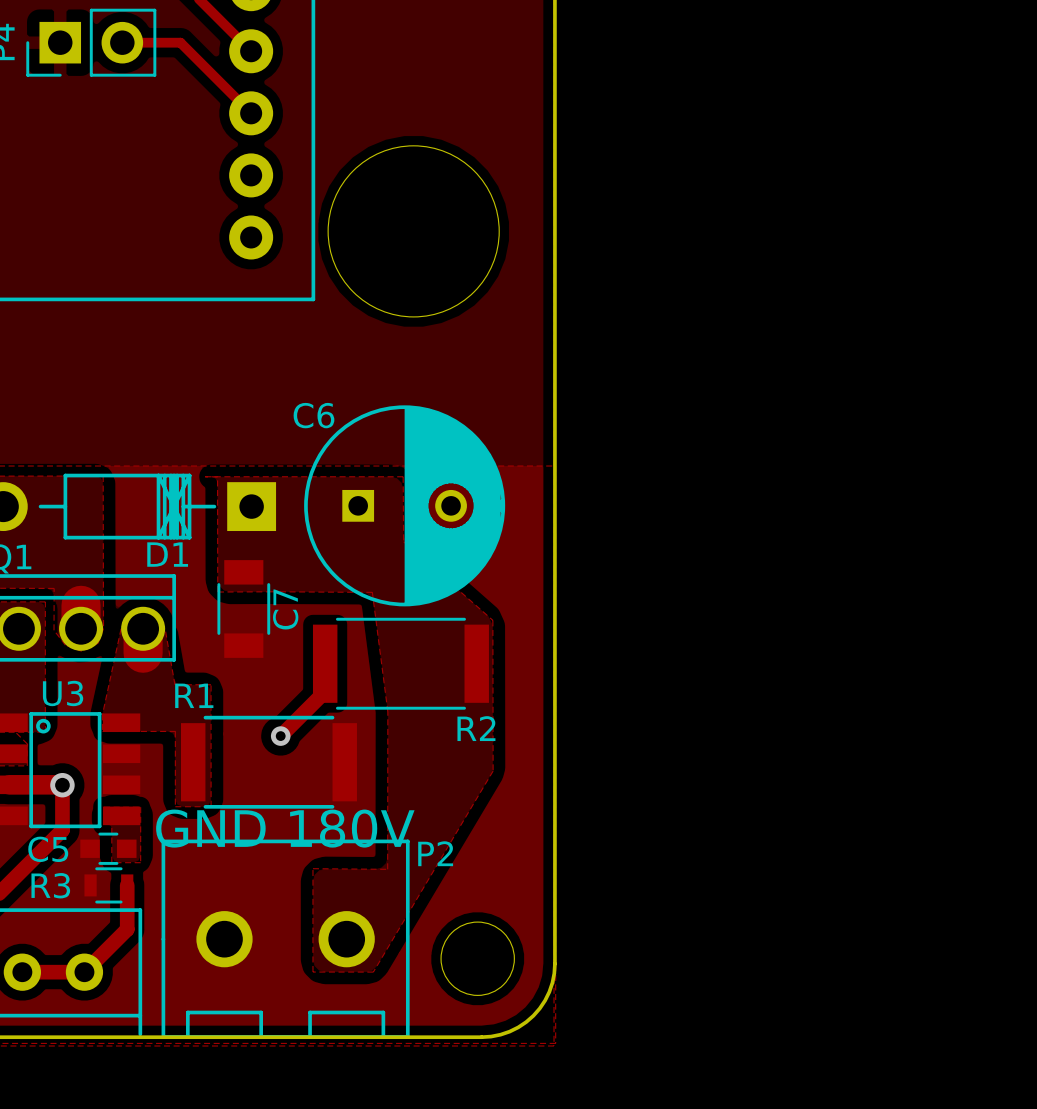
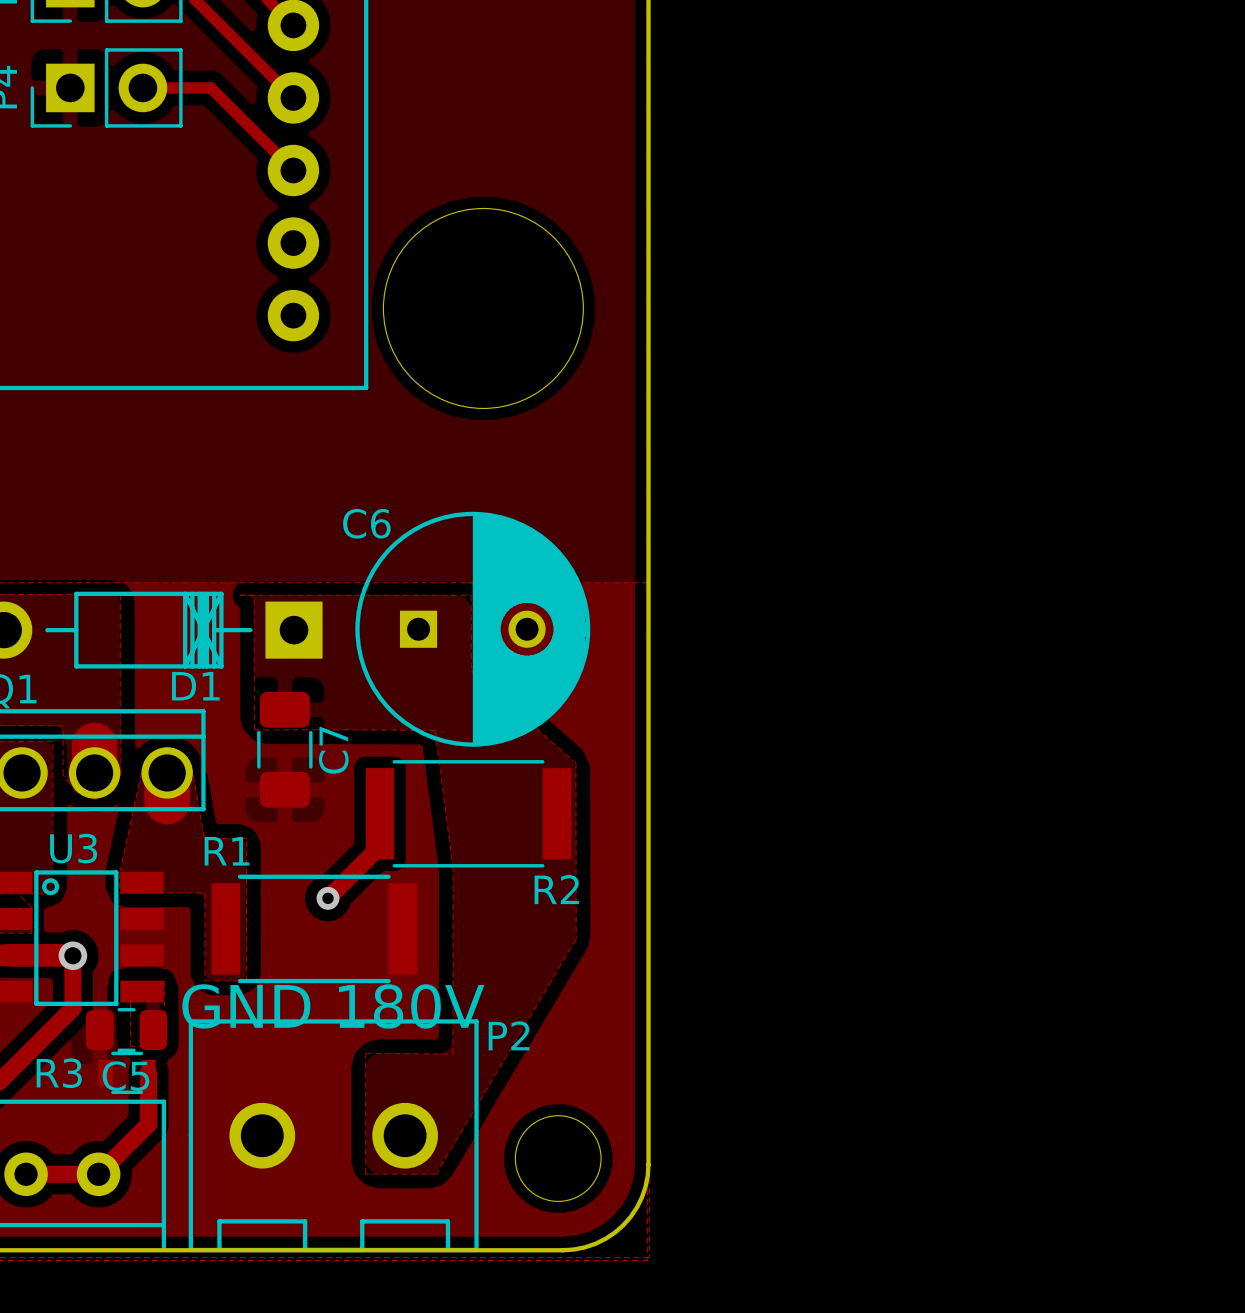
C7 footprint: [217, 560, 271, 658] -> [257, 691, 313, 808]
C5 footprint: [80, 832, 137, 865] -> [85, 1008, 168, 1053]
C5 name position: C5 (48, 849) -> C5 (126, 1076)

